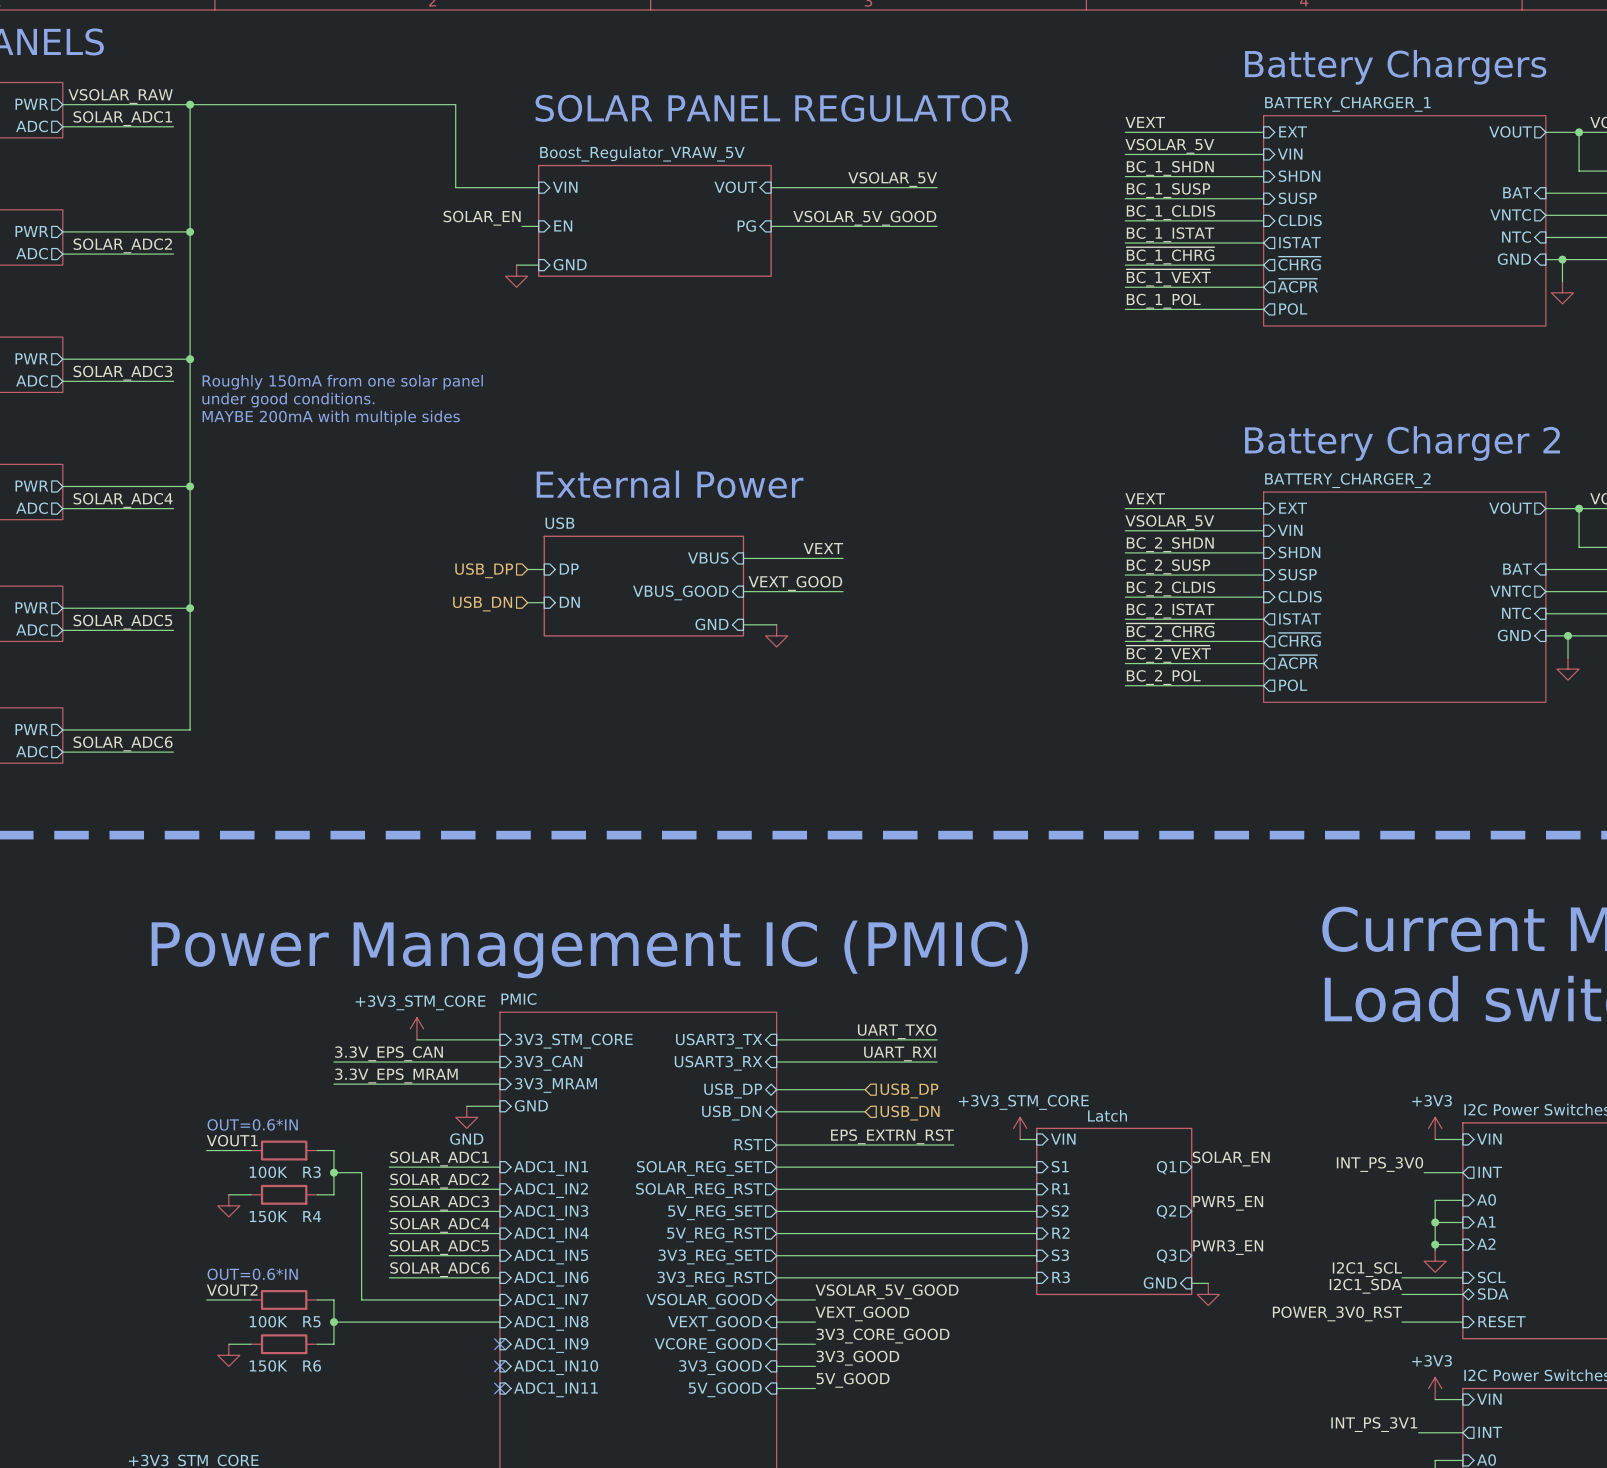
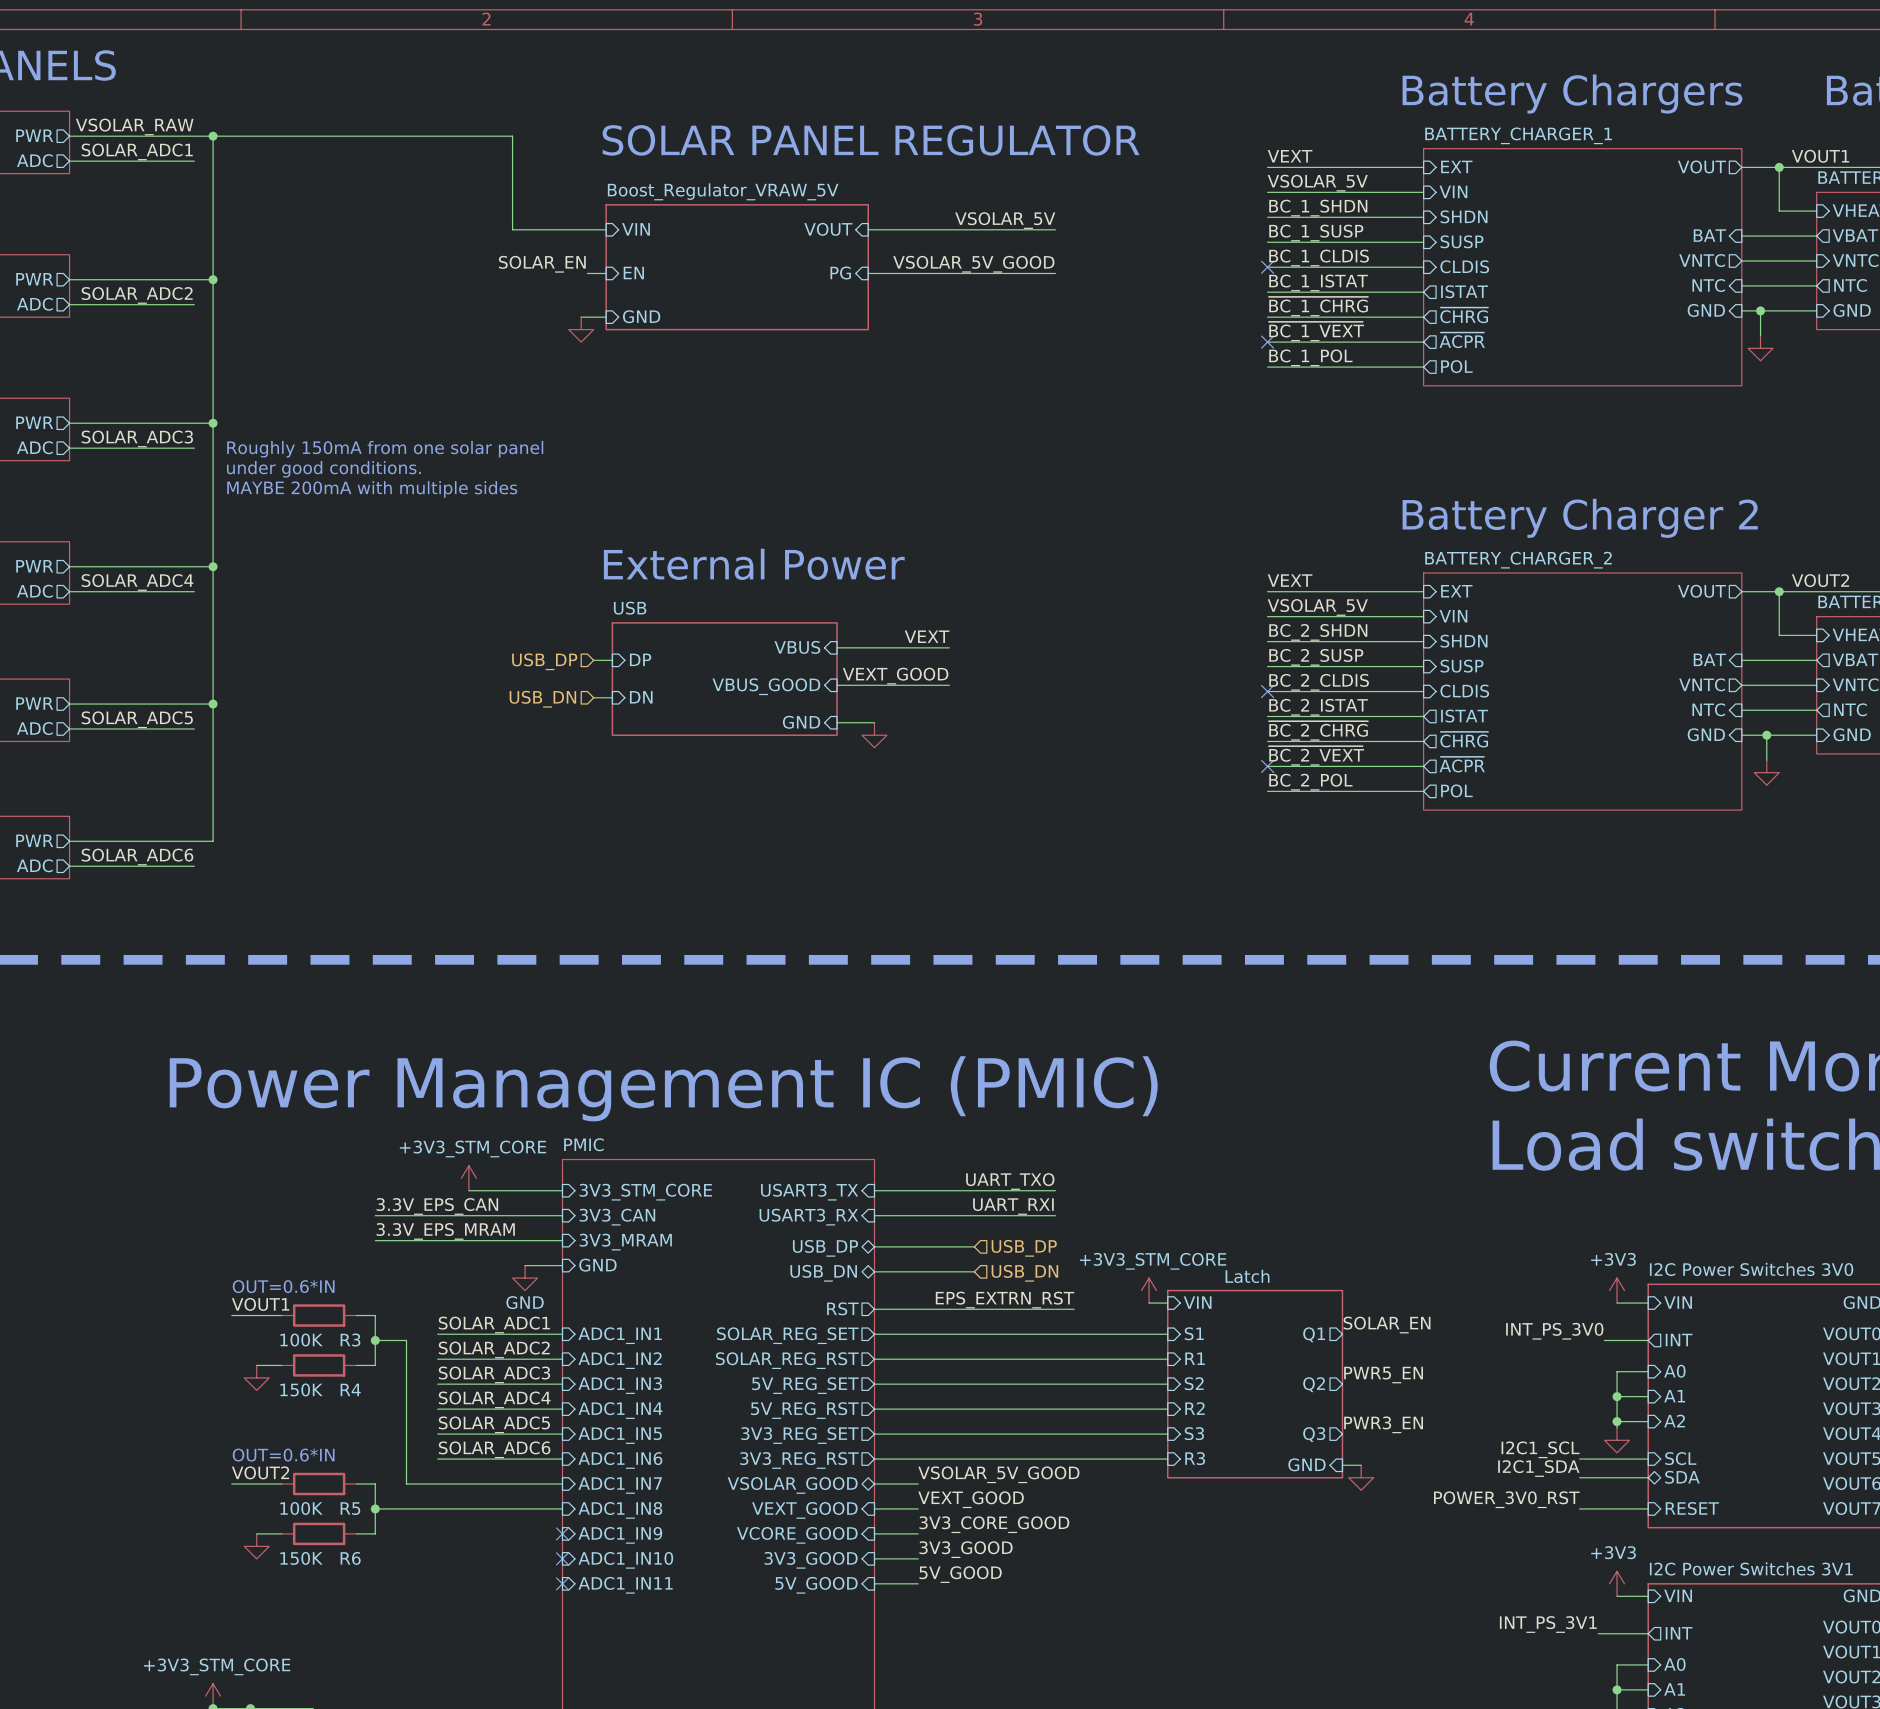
no-connect mark: none -> (1267, 267)
no-connect mark: none -> (1267, 342)
no-connect mark: none -> (1267, 691)
no-connect mark: none -> (1267, 766)

